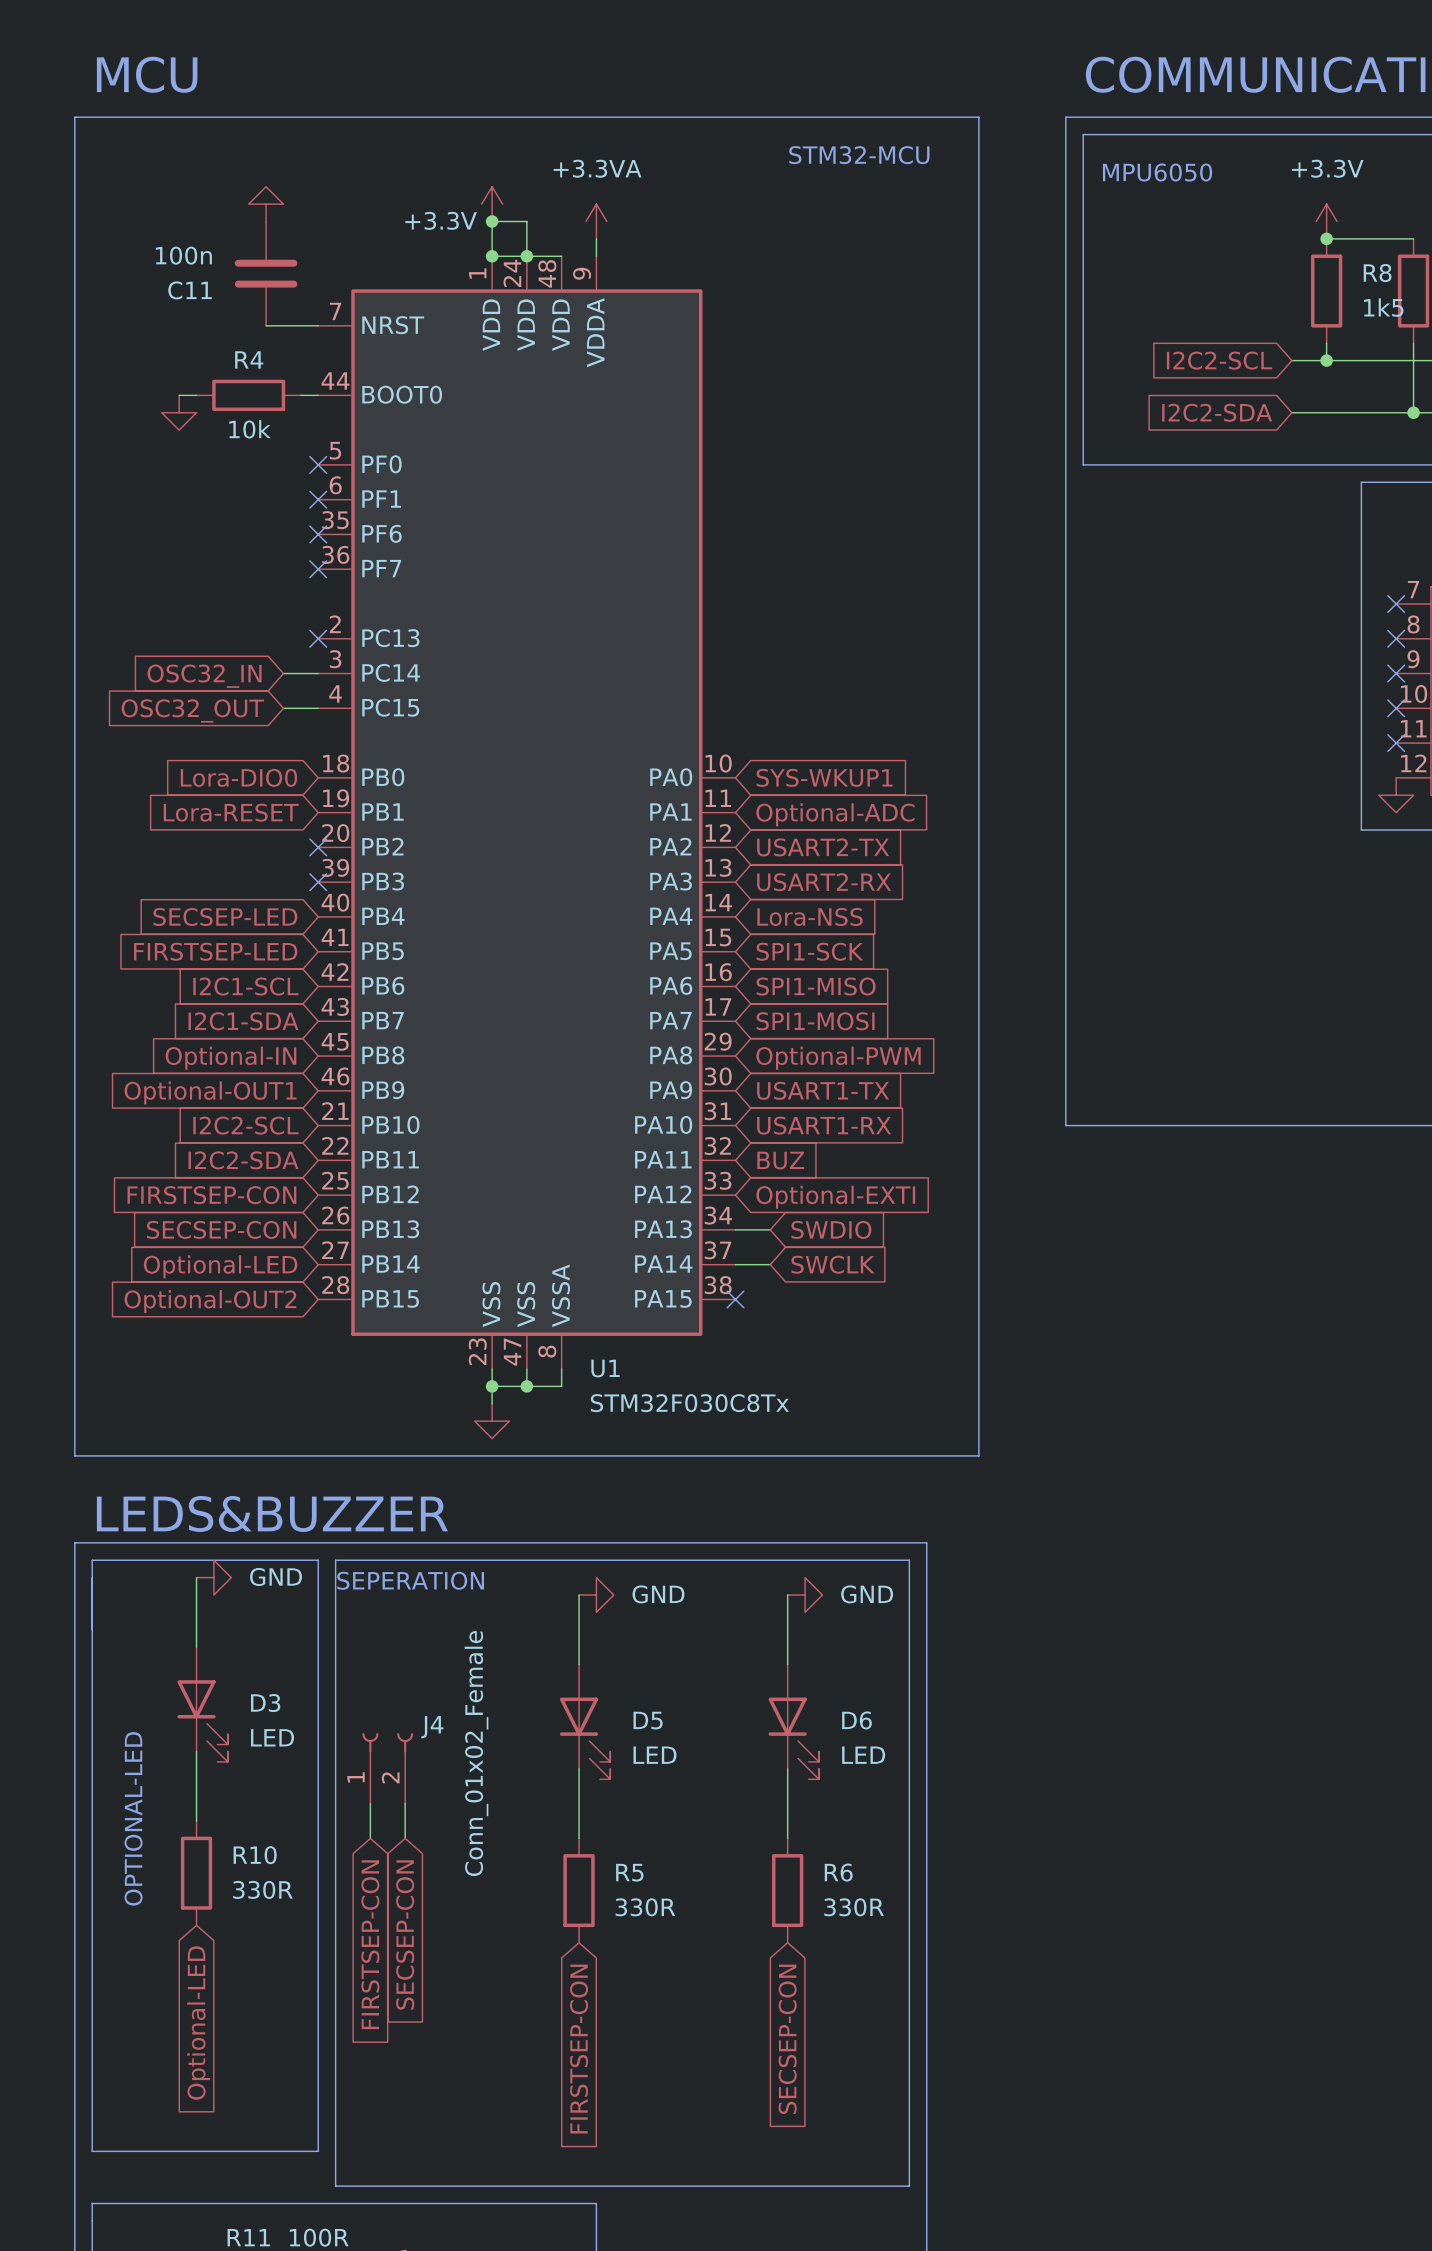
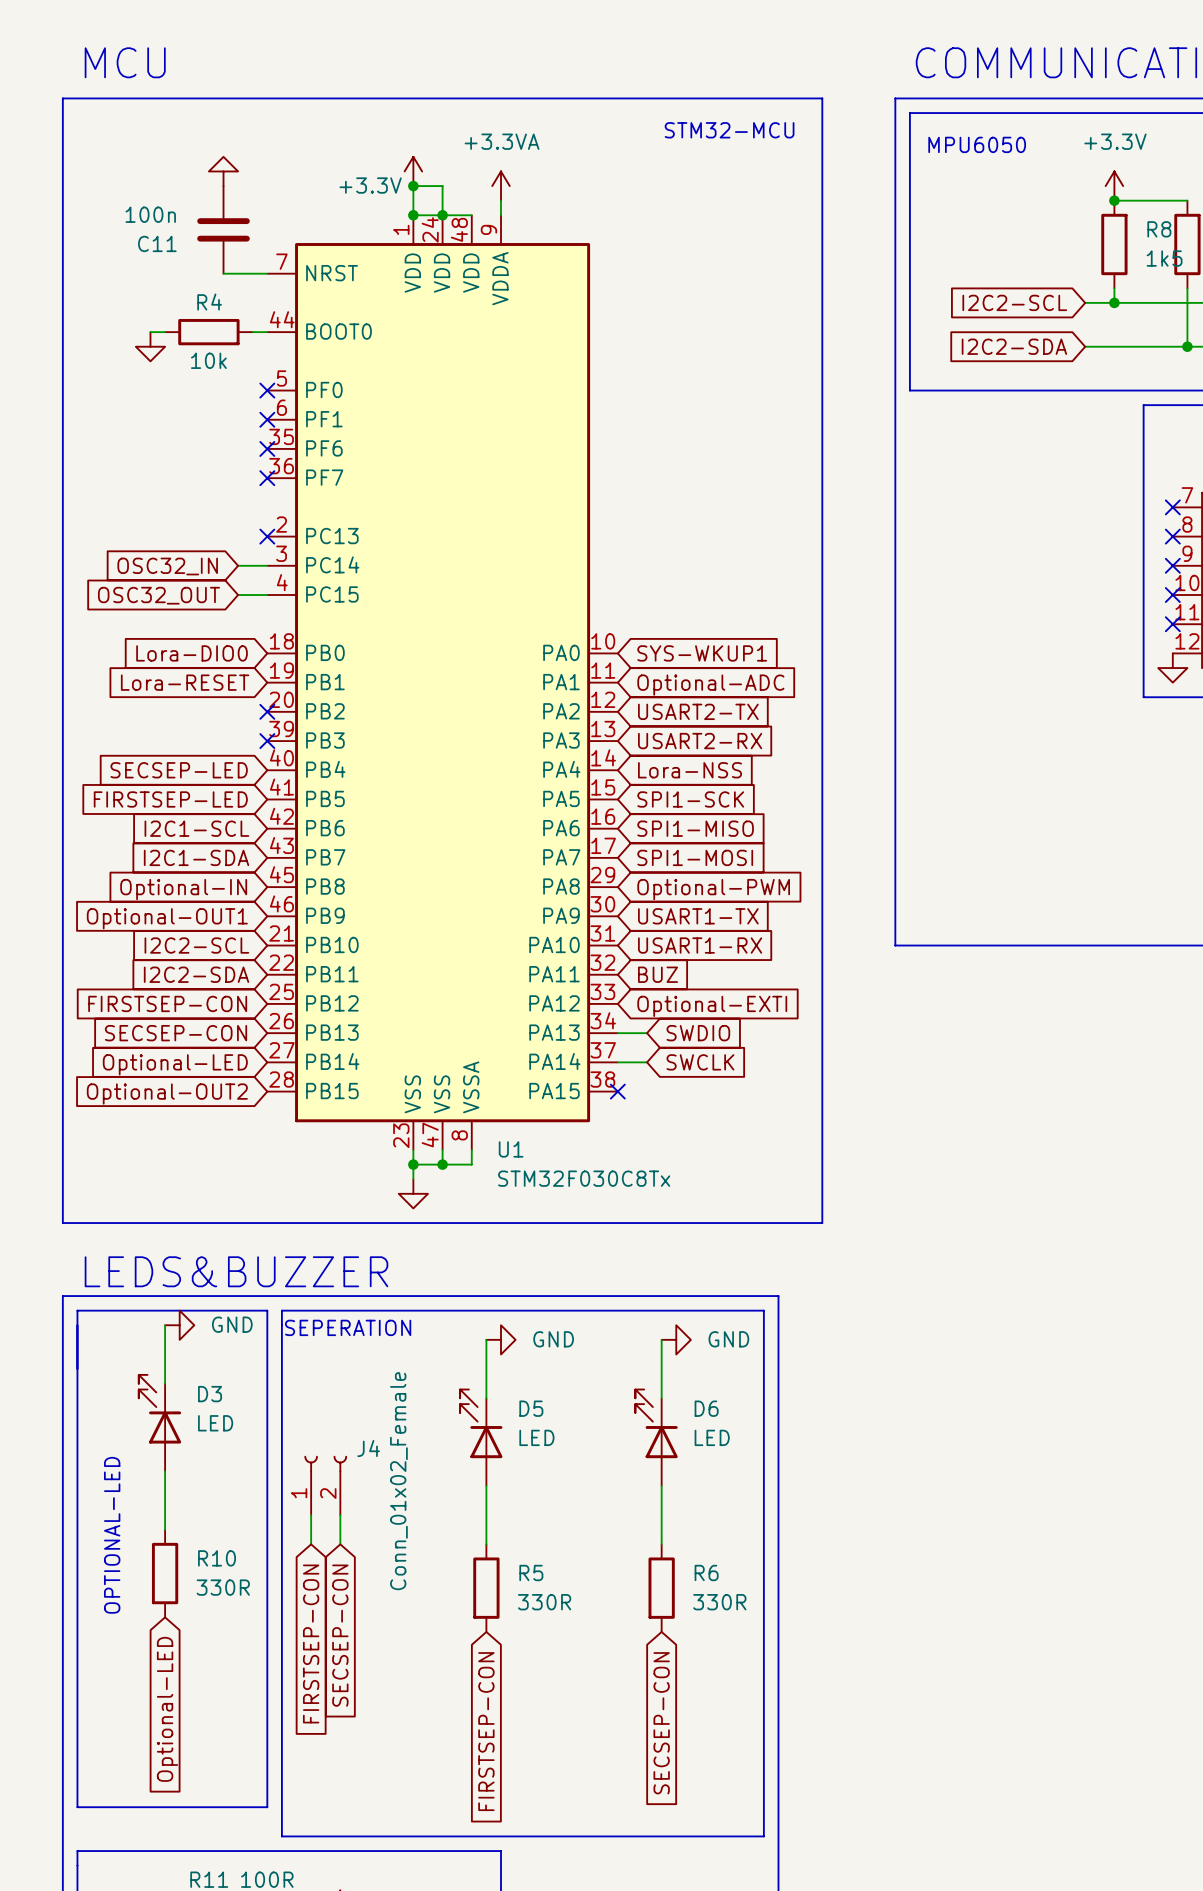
D3 name position: D3 (265, 1703) -> D3 (210, 1394)
D5 name position: D5 (648, 1720) -> D5 (531, 1408)
D6 name position: D6 (857, 1720) -> D6 (706, 1408)
D3 rotation: 0° (202, 1721) -> 180° (159, 1409)
D3 value position: LED (272, 1737) -> LED (215, 1423)
D5 rotation: 0° (585, 1738) -> 180° (481, 1423)
D6 rotation: 0° (793, 1738) -> 180° (656, 1423)
D5 value position: LED (655, 1755) -> LED (536, 1437)
D6 value position: LED (863, 1755) -> LED (712, 1437)

